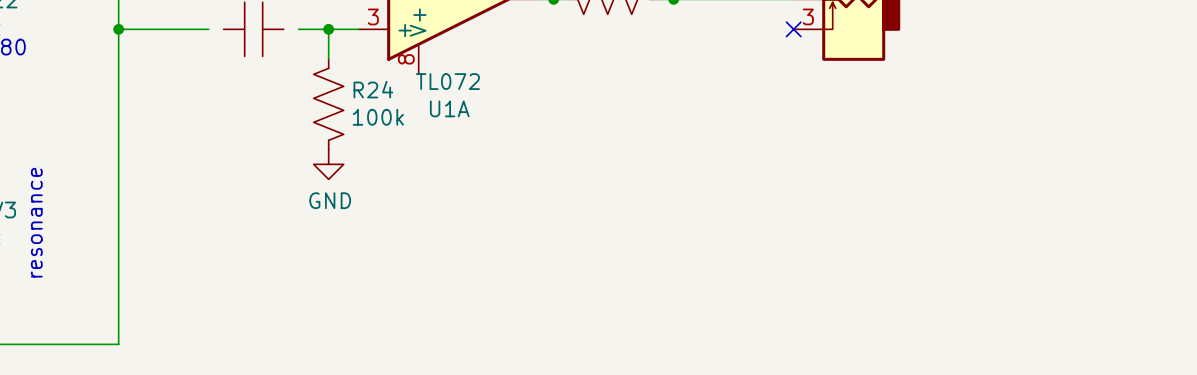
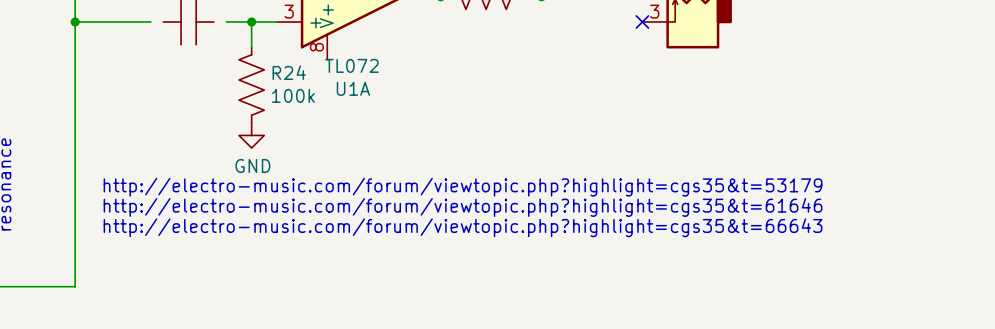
text: none -> http://electro-music.com/forum/viewtopic.php?highlight=cgs35&t=53179 (463, 187)
text: none -> http://electro-music.com/forum/viewtopic.php?highlight=cgs35&t=61646 (463, 207)
text: none -> http://electro-music.com/forum/viewtopic.php?highlight=cgs35&t=66643 (463, 227)

